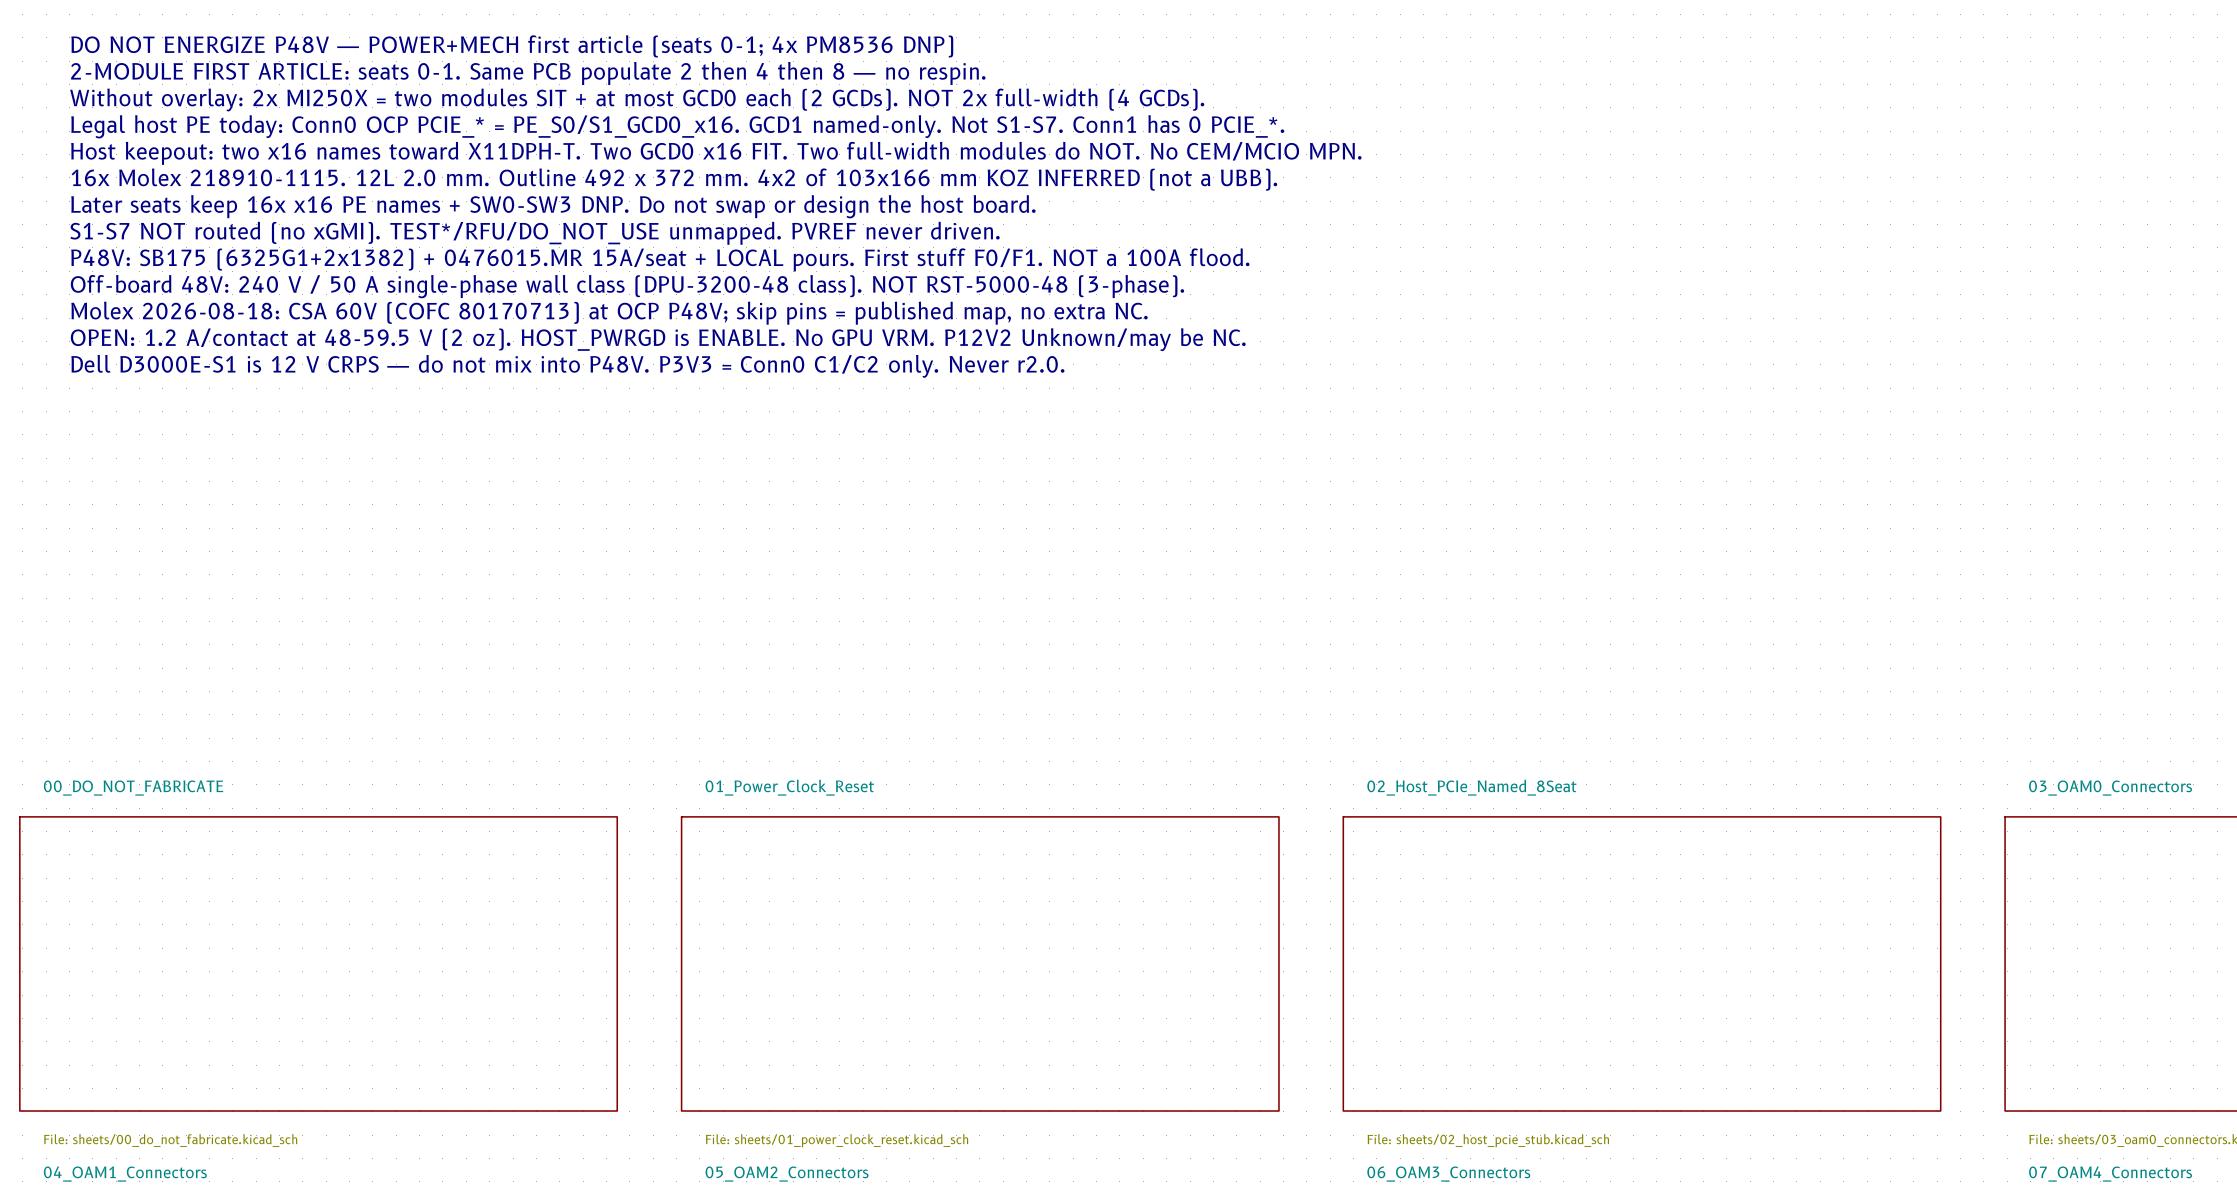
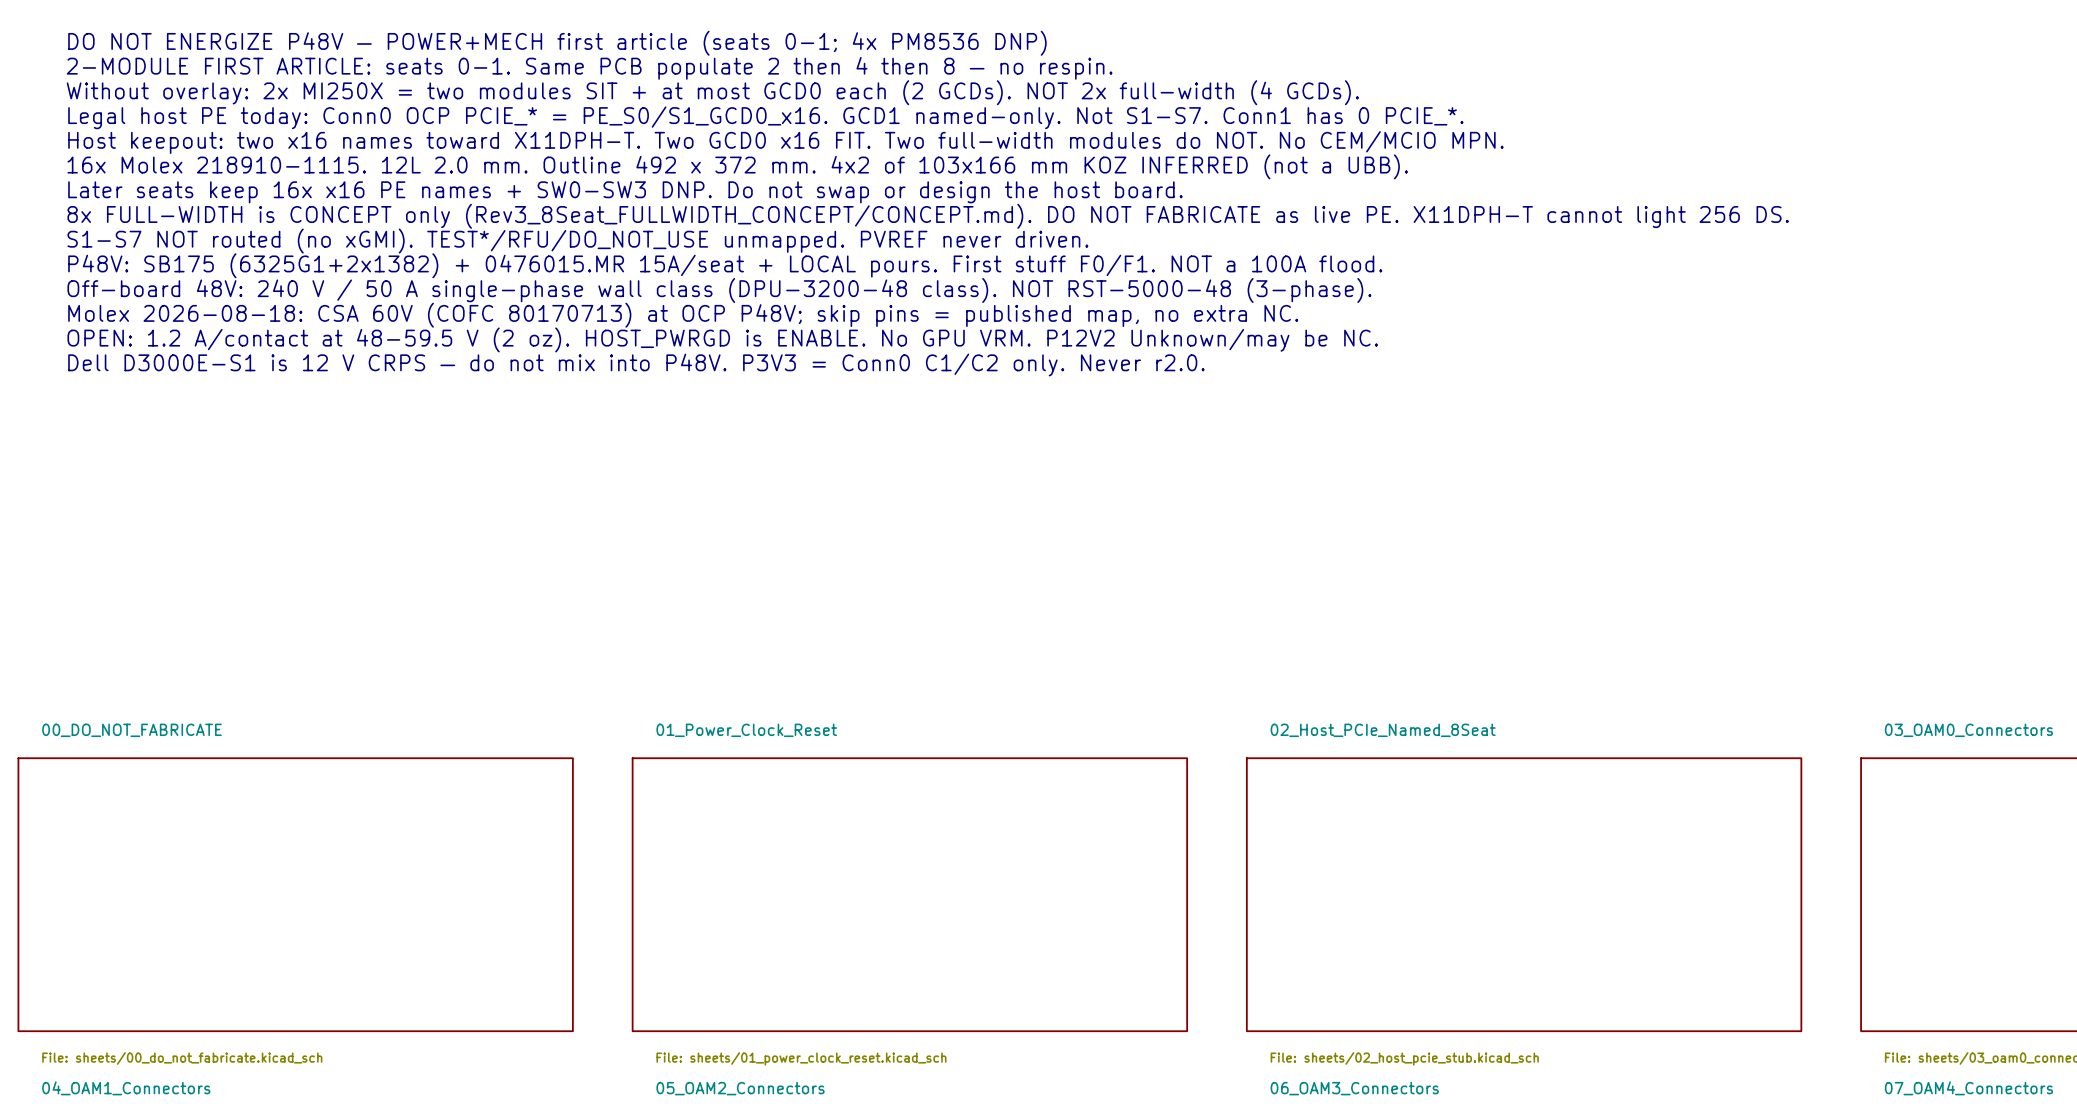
text: S1-S7 NOT routed (no xGMI). TEST*/RFU/DO_NOT_USE unmapped. PVREF never driven. (535, 233) -> 8x FULL-WIDTH is CONCEPT only (Rev3_8Seat_FULLWIDTH_CONCEPT/CONCEPT.md). DO NOT FABRICATE as live PE. X11DPH-T cannot light 256 DS. (928, 216)
text: P48V: SB175 (6325G1+2x1382) + 0476015.MR 15A/seat + LOCAL pours. First stuff F0/F1. NOT a 100A flood. (660, 259) -> S1-S7 NOT routed (no xGMI). TEST*/RFU/DO_NOT_USE unmapped. PVREF never driven. (577, 241)
text: Off-board 48V: 240 V / 50 A single-phase wall class (DPU-3200-48 class). NOT RST-5000-48 (3-phase). (627, 286) -> P48V: SB175 (6325G1+2x1382) + 0476015.MR 15A/seat + LOCAL pours. First stuff F0/F1. NOT a 100A flood. (725, 265)
text: Molex 2026-08-18: CSA 60V (COFC 80170713) at OCP P48V; skip pins = published map, no extra NC. (609, 313) -> Off-board 48V: 240 V / 50 A single-phase wall class (DPU-3200-48 class). NOT RST-5000-48 (3-phase). (719, 290)
text: OPEN: 1.2 A/contact at 48-59.5 V (2 oz). HOST_PWRGD is ENABLE. No GPU VRM. P12V2 Unknown/may be NC. (658, 339) -> Molex 2026-08-18: CSA 60V (COFC 80170713) at OCP P48V; skip pins = published map, no extra NC. (683, 315)
text: Dell D3000E-S1 is 12 V CRPS — do not mix into P48V. P3V3 = Conn0 C1/C2 only. Never r2.0. (567, 366) -> OPEN: 1.2 A/contact at 48-59.5 V (2 oz). HOST_PWRGD is ENABLE. No GPU VRM. P12V2 Unknown/may be NC. (722, 339)
text: none -> Dell D3000E-S1 is 12 V CRPS — do not mix into P48V. P3V3 = Conn0 C1/C2 only. Never r2.0. (636, 365)

